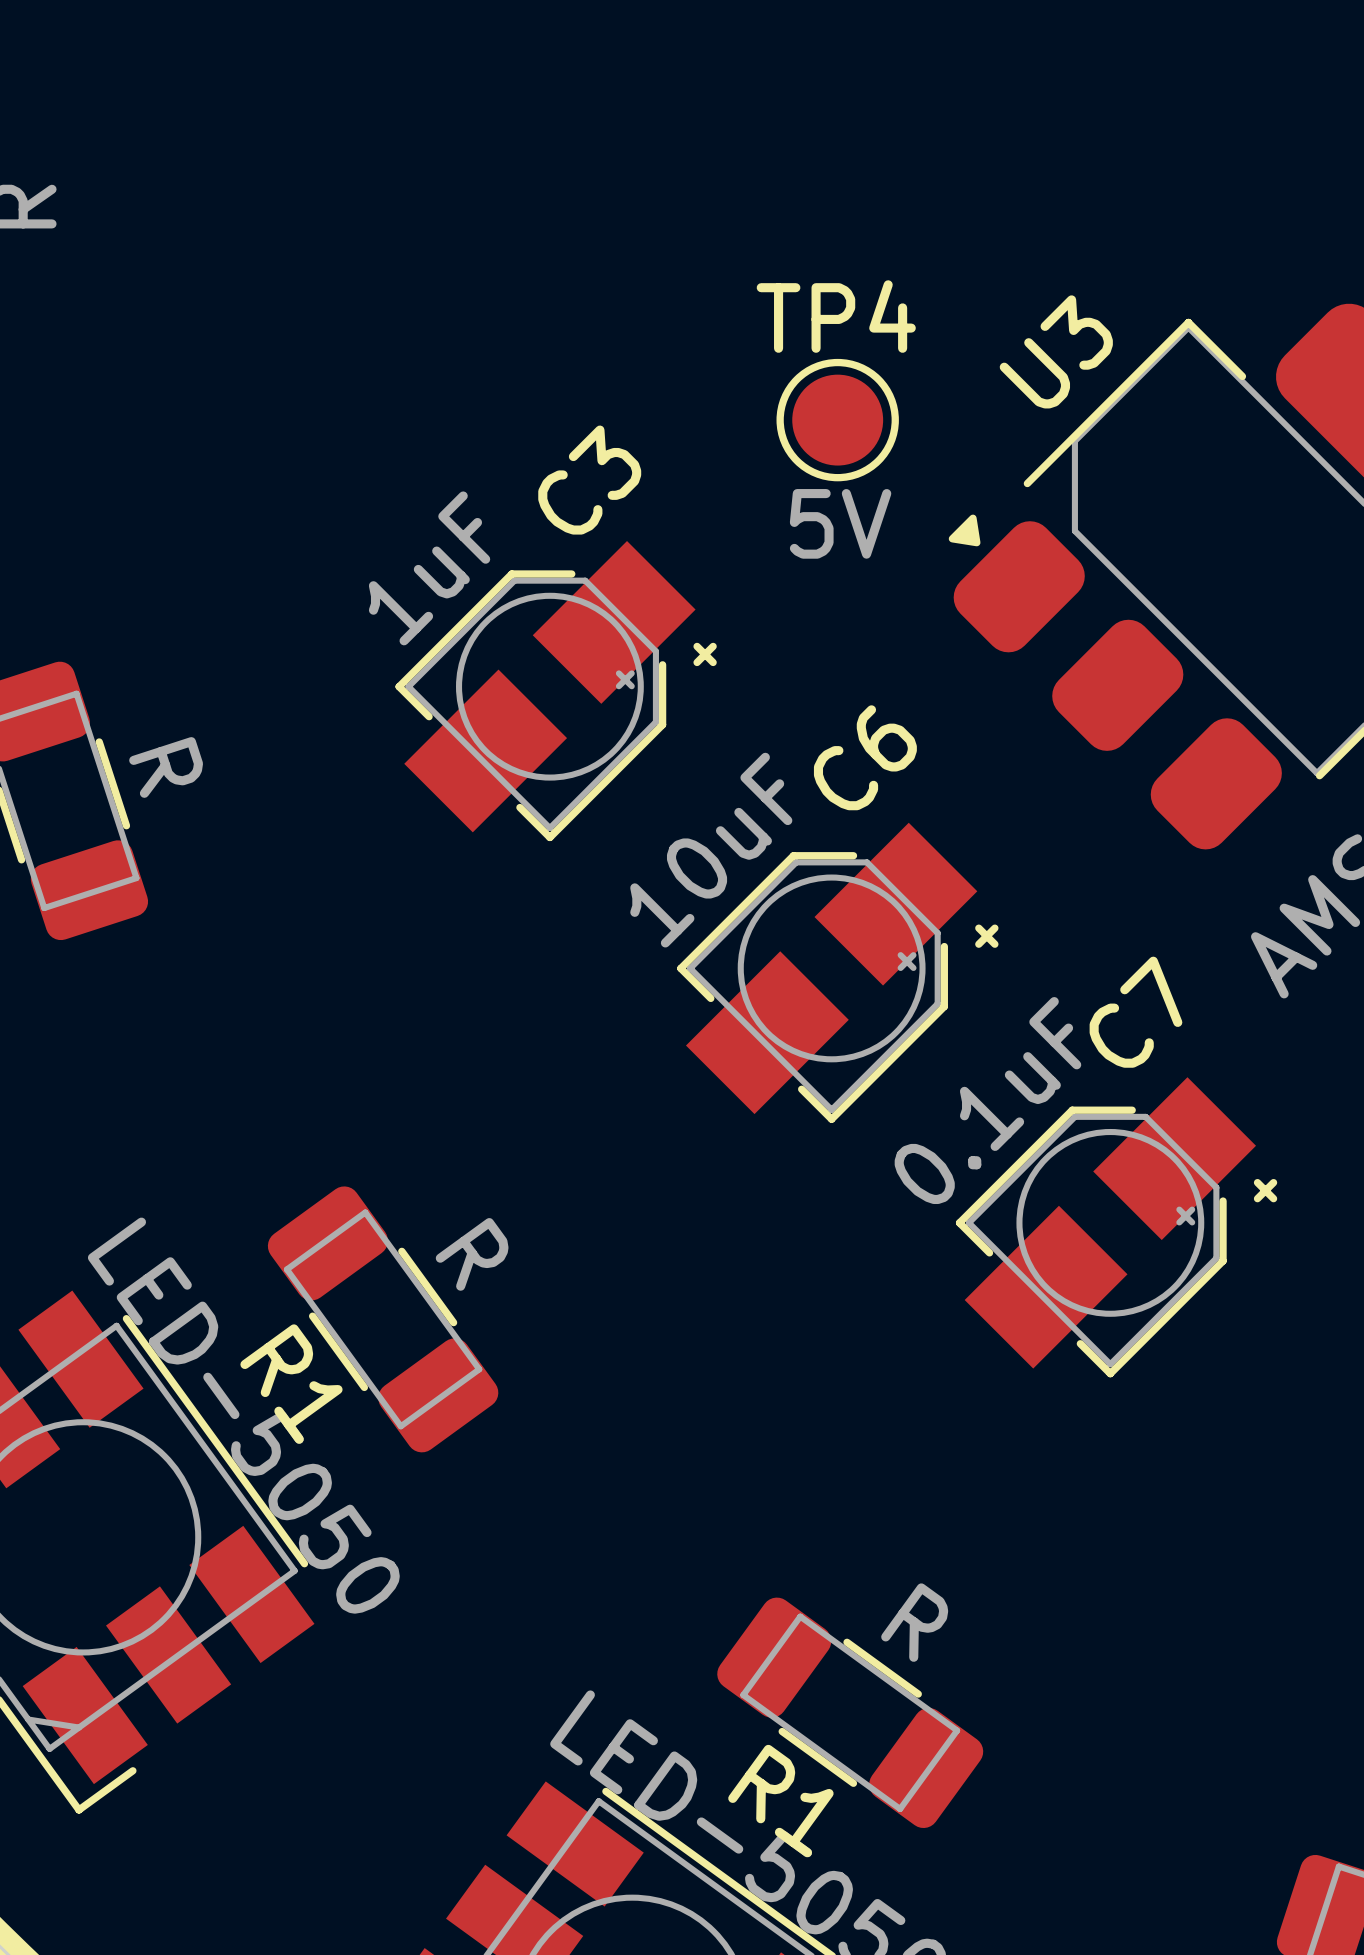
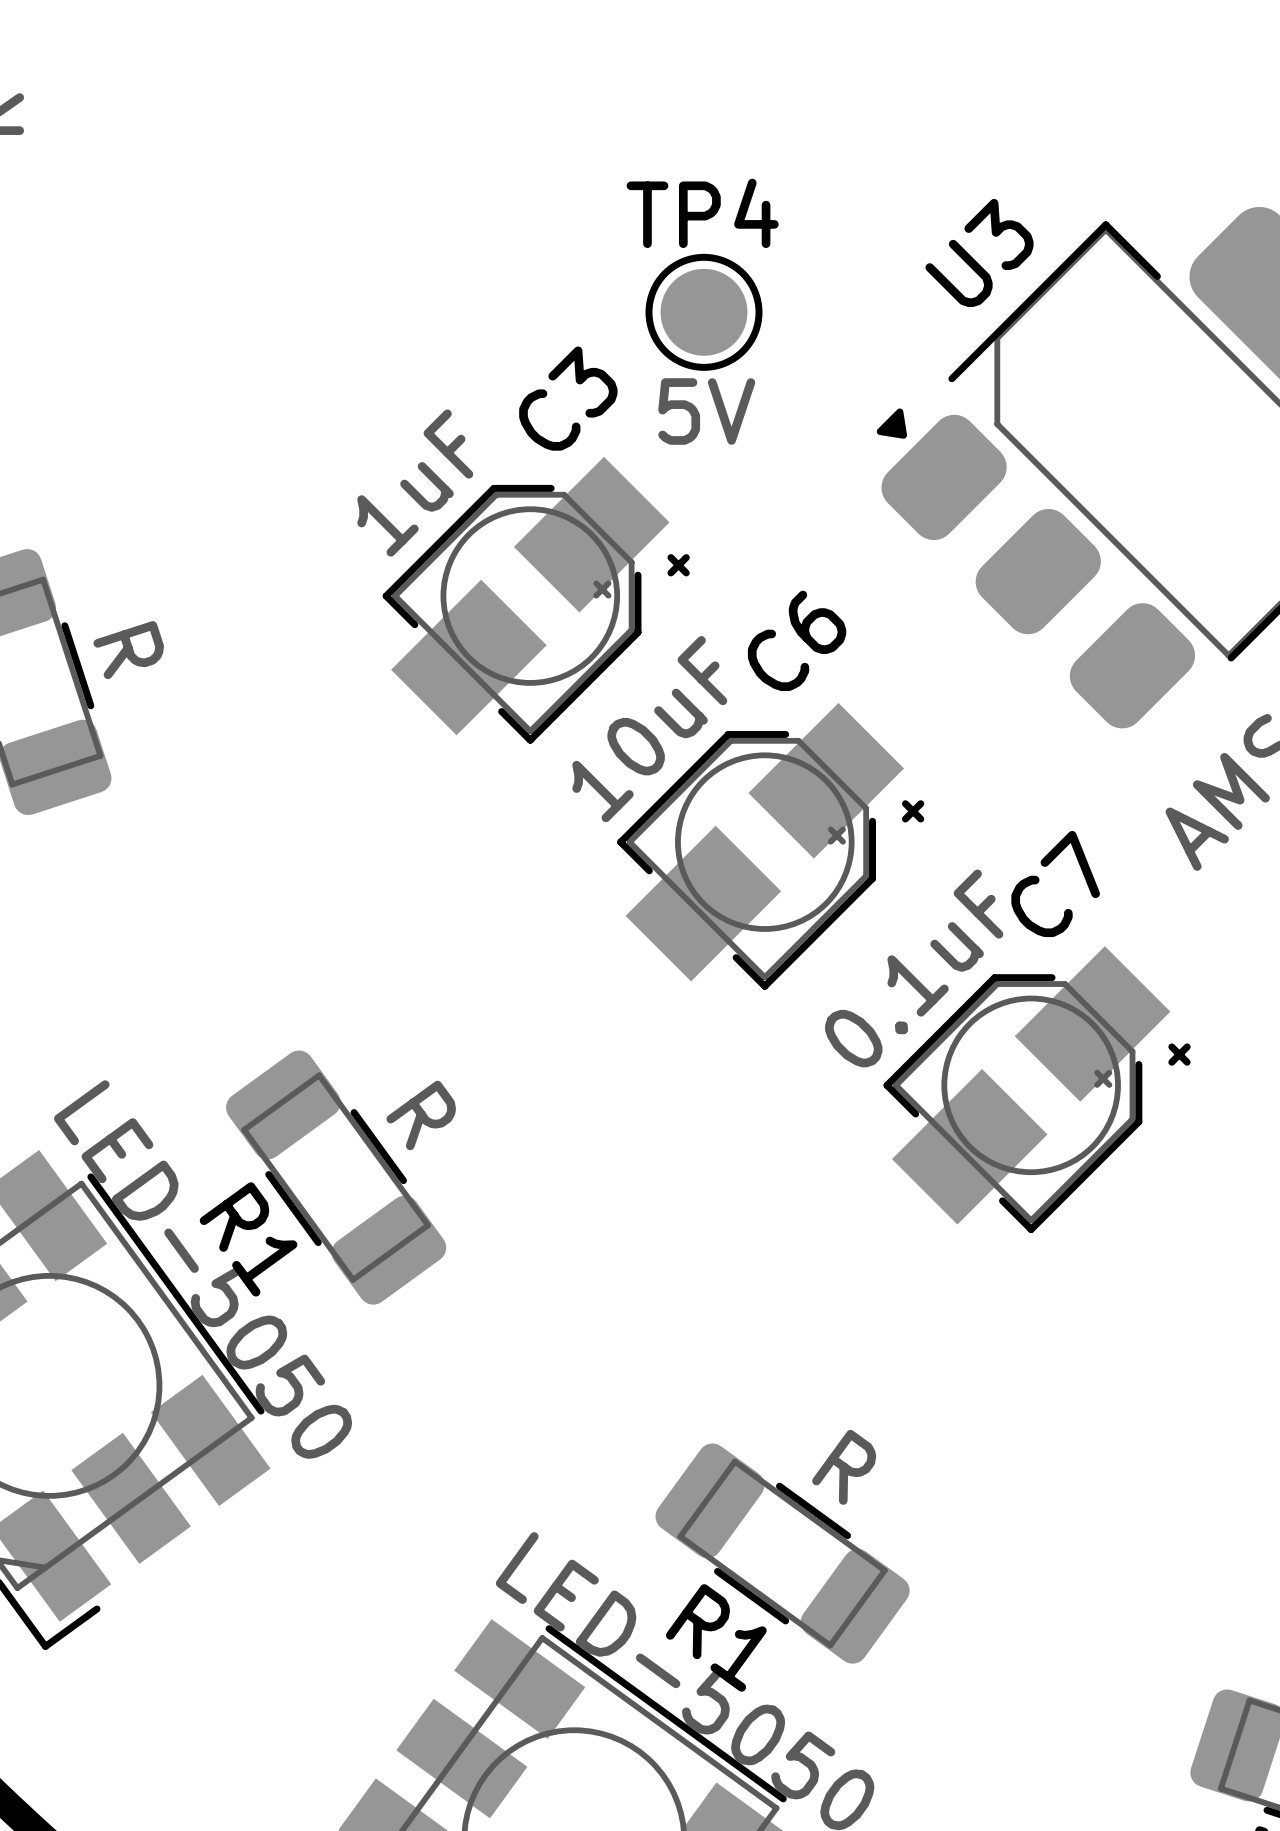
TP4 position: (837, 420) -> (704, 312)
C3 position: (556, 691) -> (536, 600)

